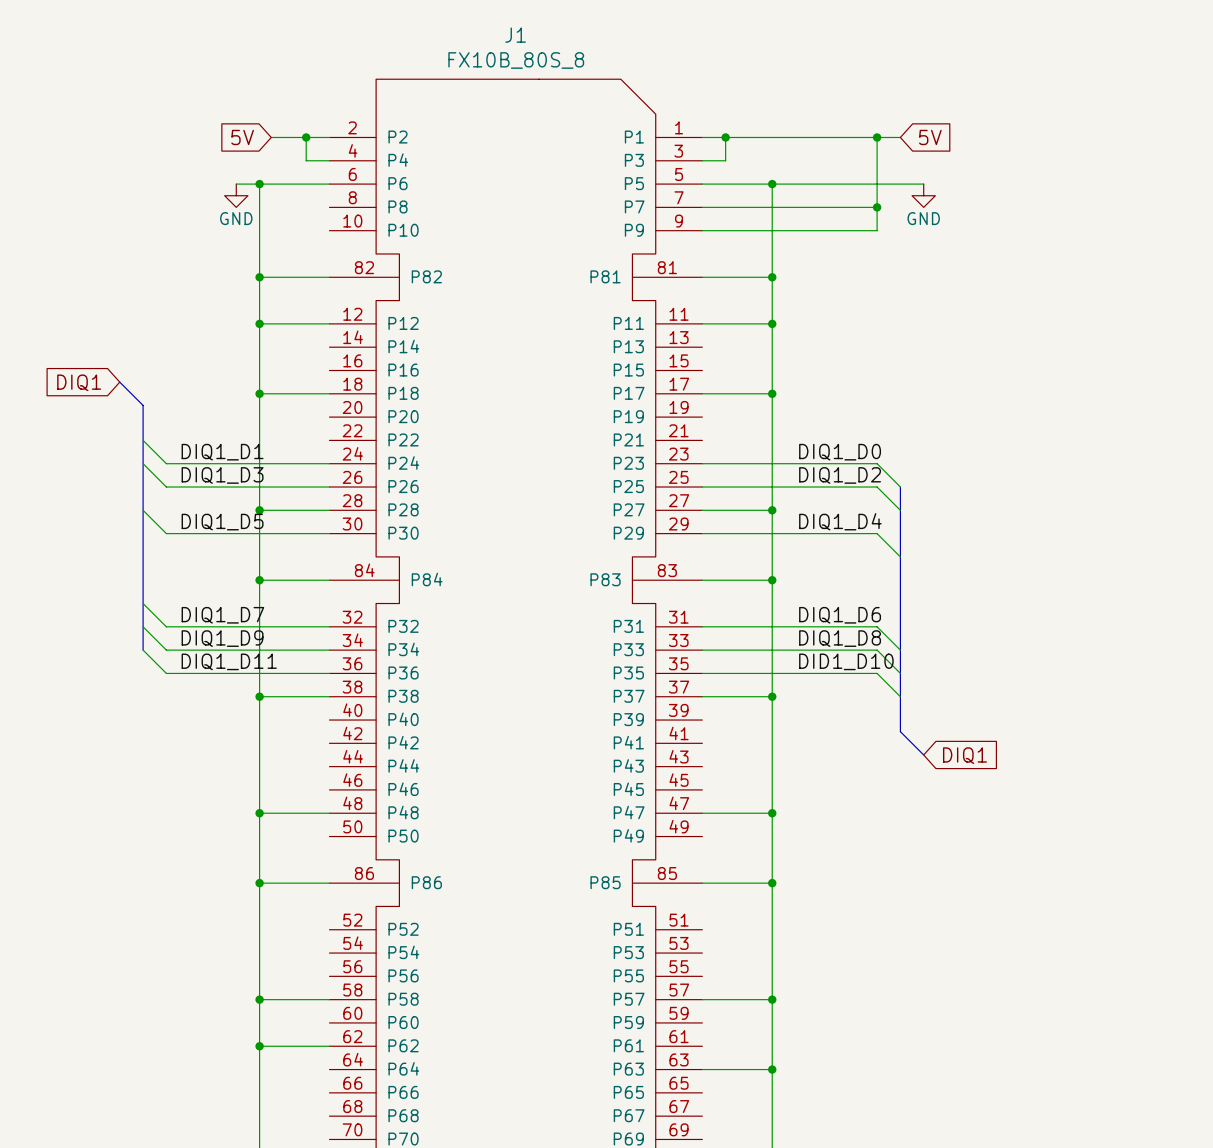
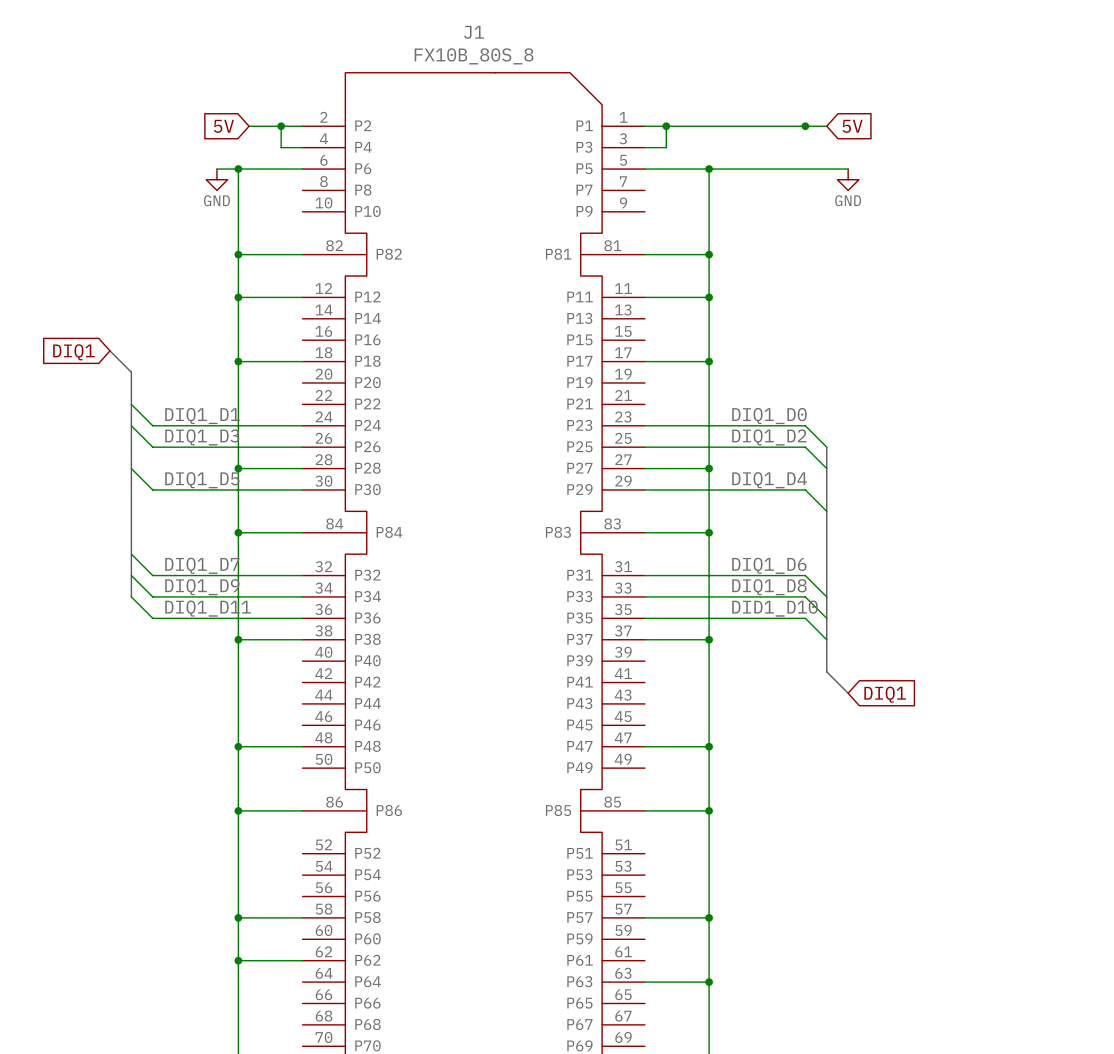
wire: (877, 137) (877, 230) (702, 230) -> none
wire: (702, 207) (877, 207) -> none
junction: (877, 207) -> none

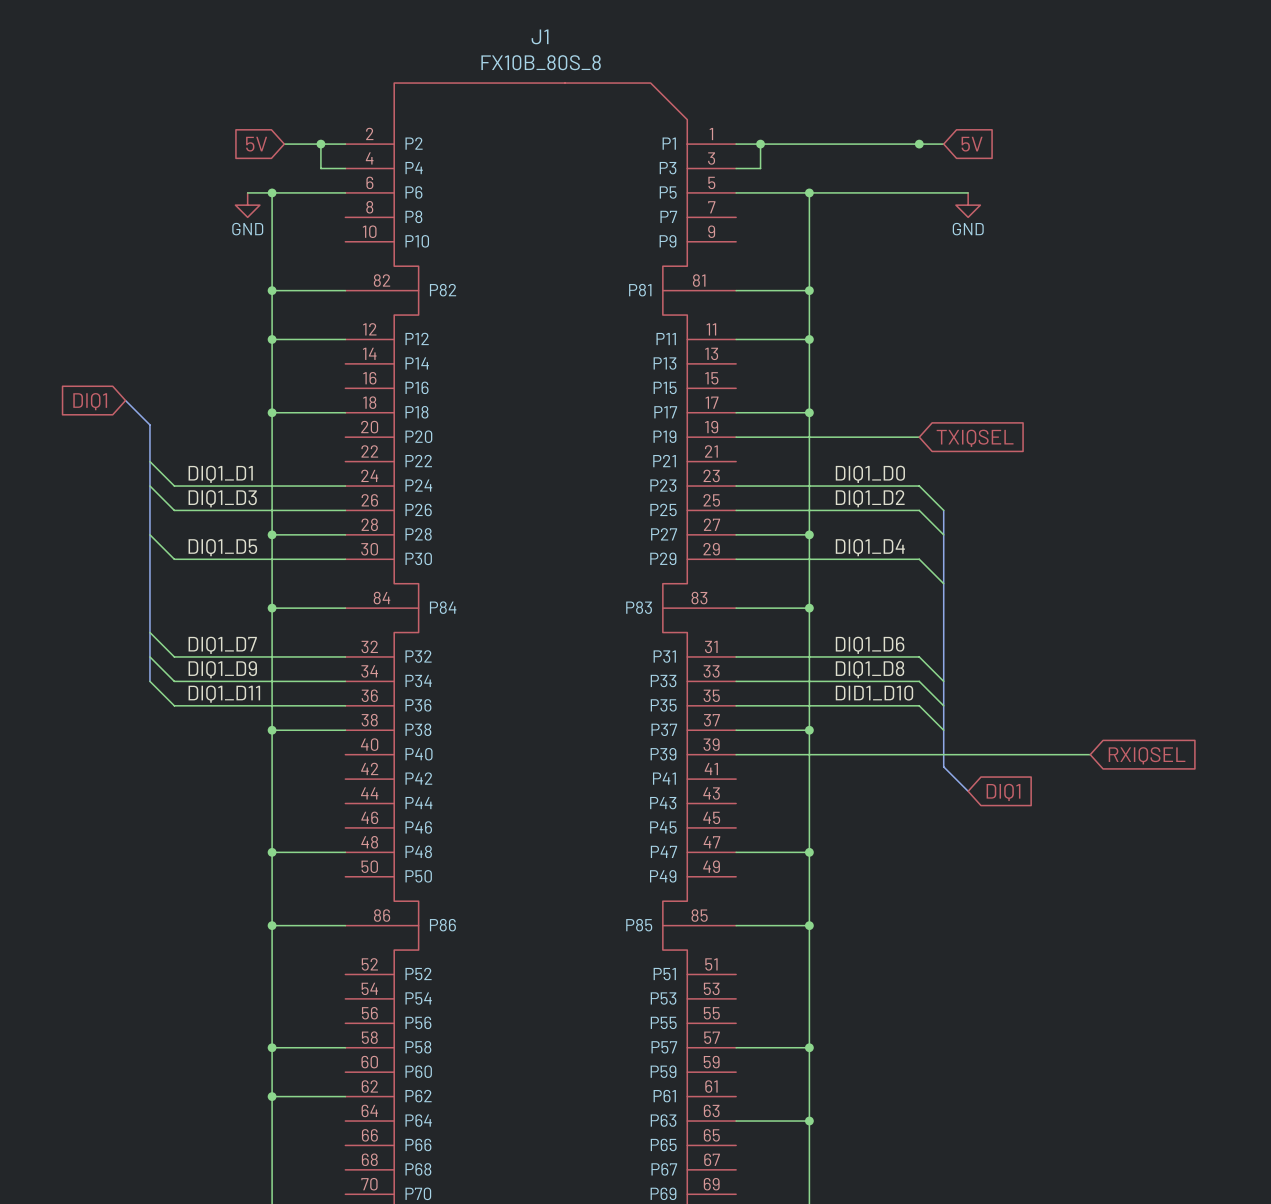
wire: none -> (736, 437) (919, 437)
global label: none -> TXIQSEL (975, 438)
wire: none -> (736, 754) (1090, 754)
global label: none -> RXIQSEL (1147, 755)

